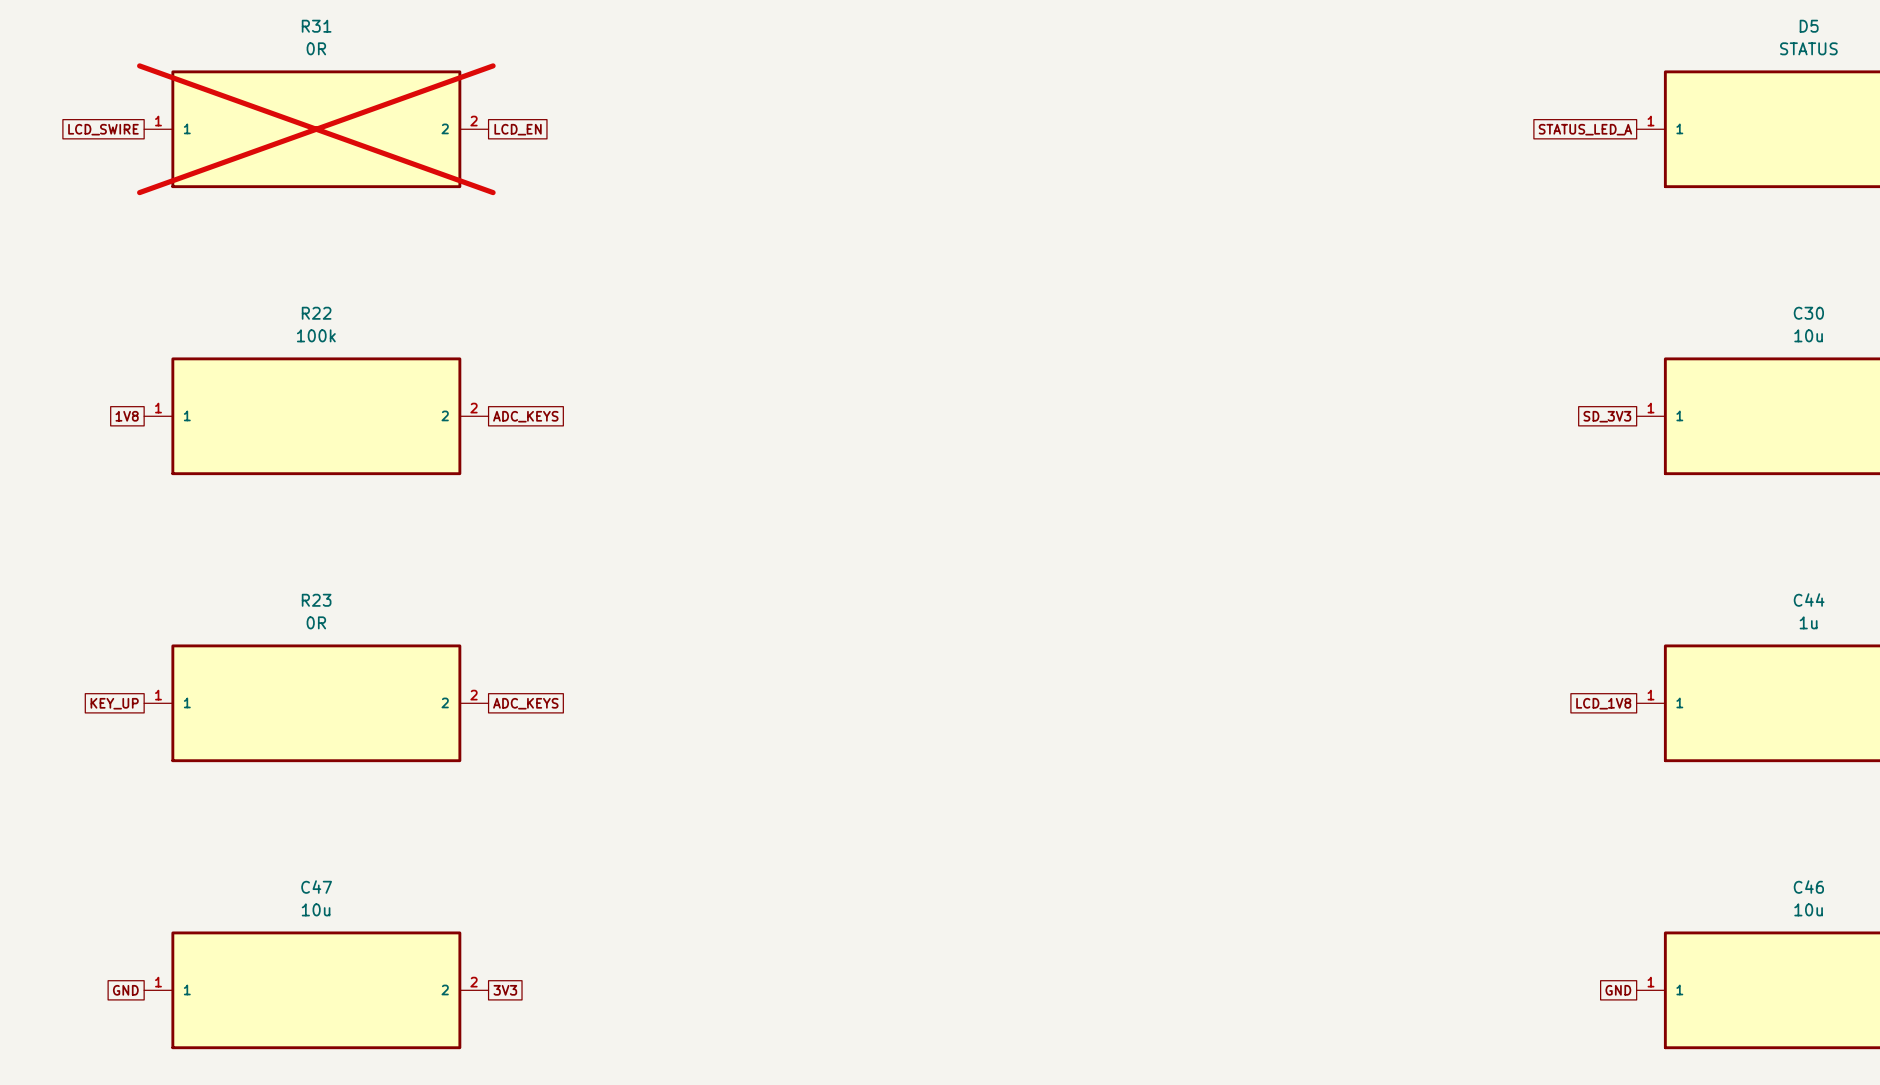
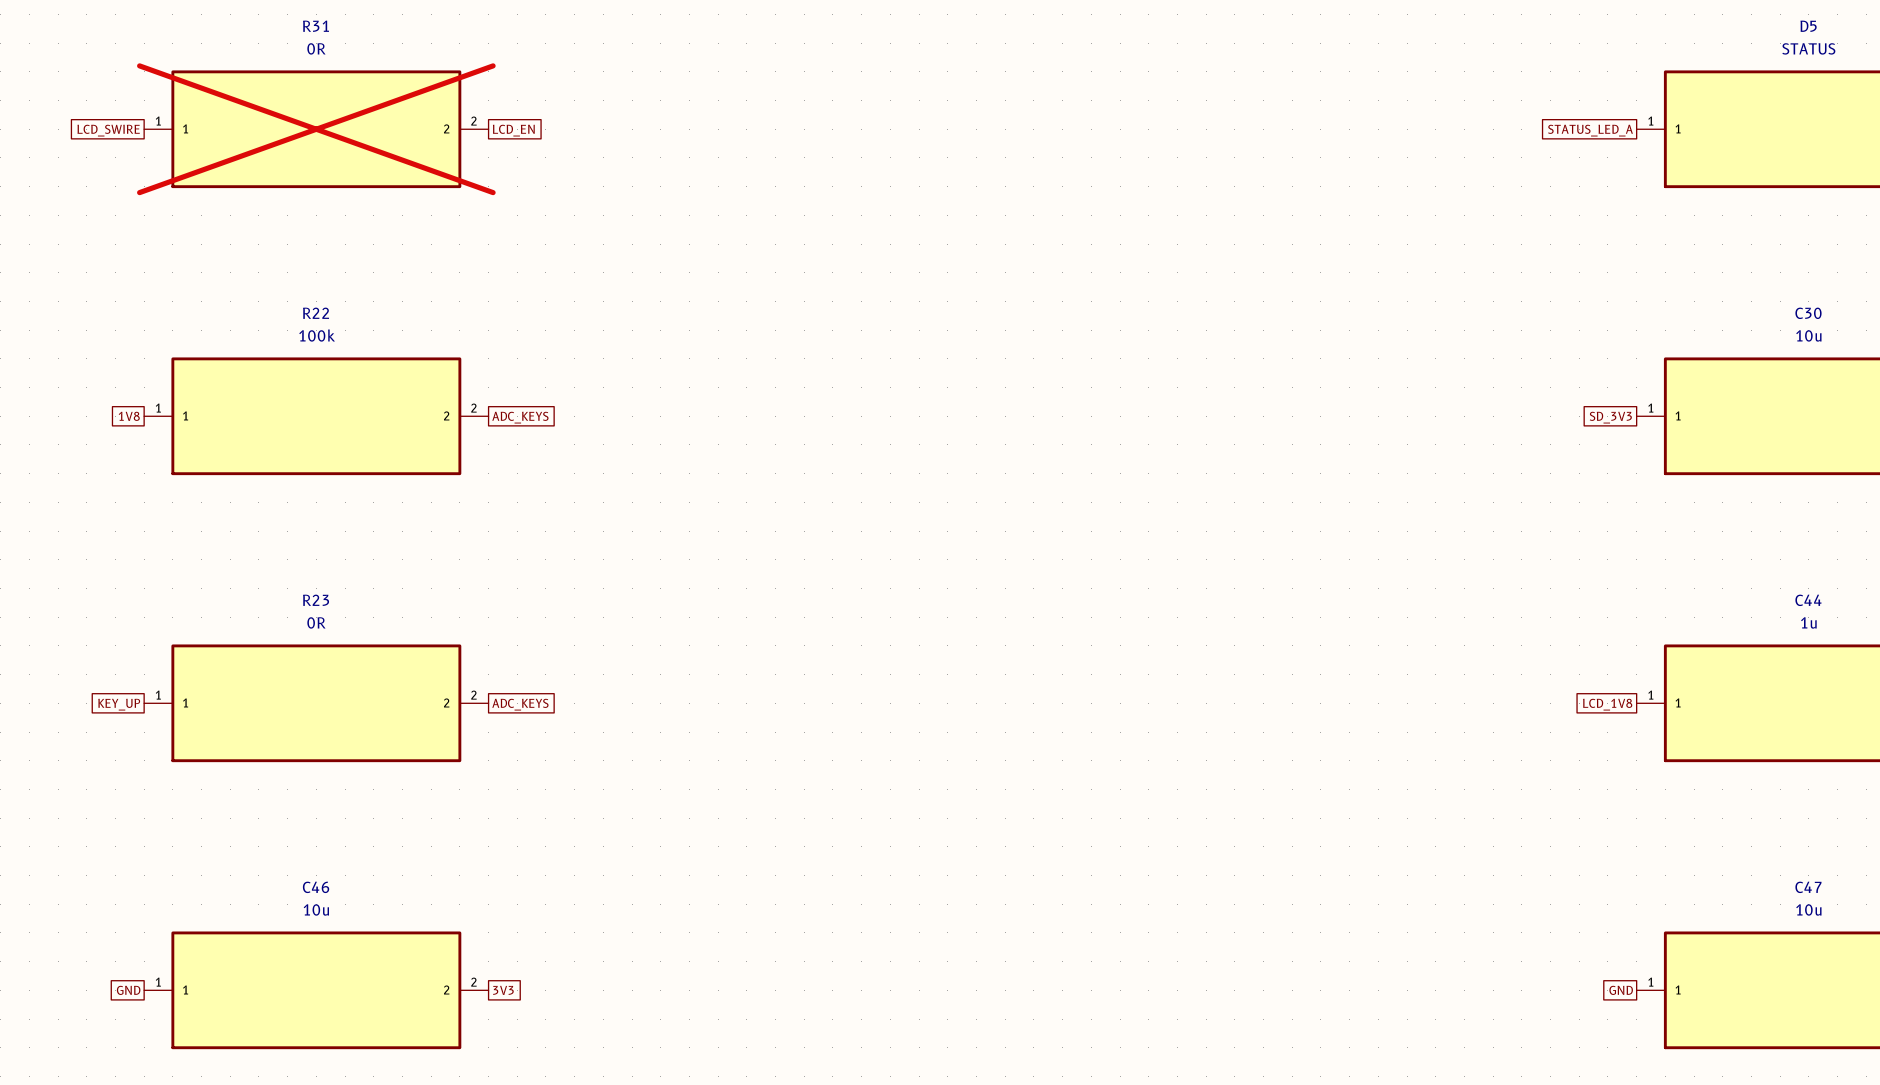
C47 name: C47 (316, 887) -> C46 (316, 887)
C46 name: C46 (1808, 887) -> C47 (1808, 887)

